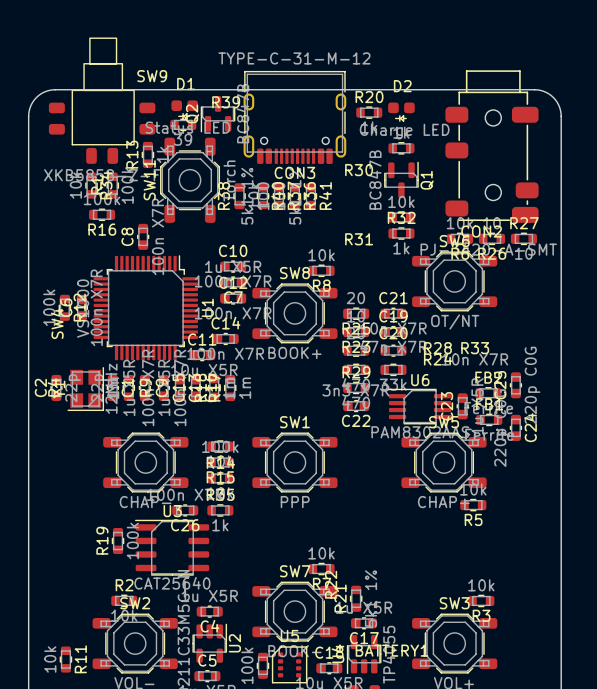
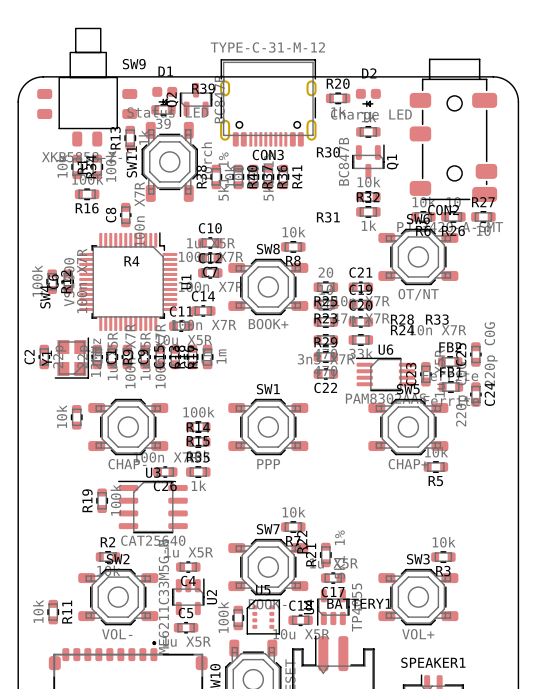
R4 rotation: 0° (220, 446) -> 90° clockwise (76, 417)
R4 position: (220, 446) -> (76, 417)

